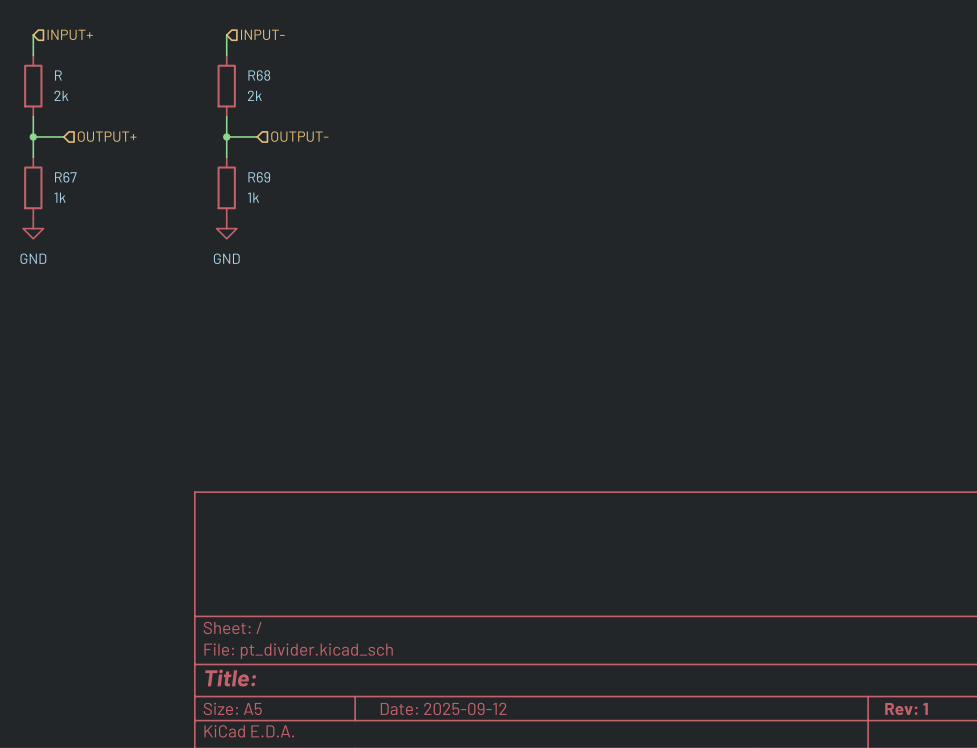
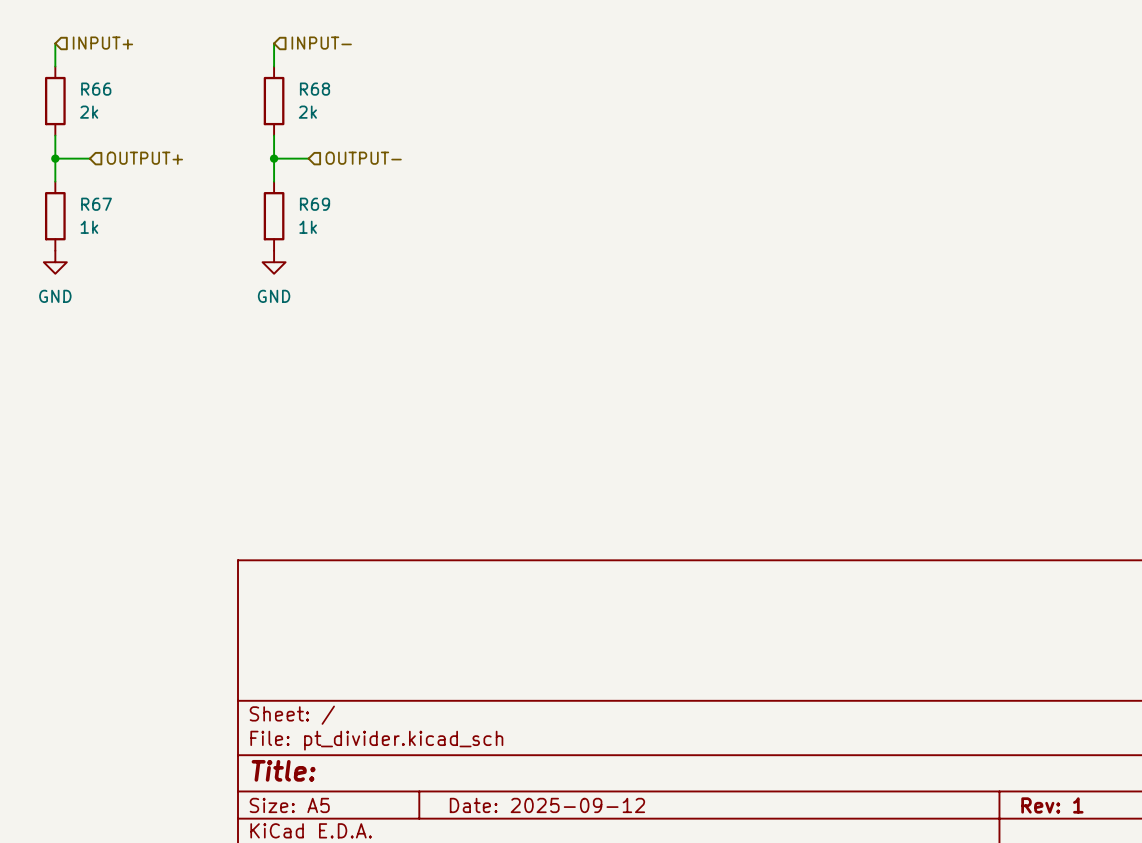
R name: R (58, 75) -> R66 (96, 89)

